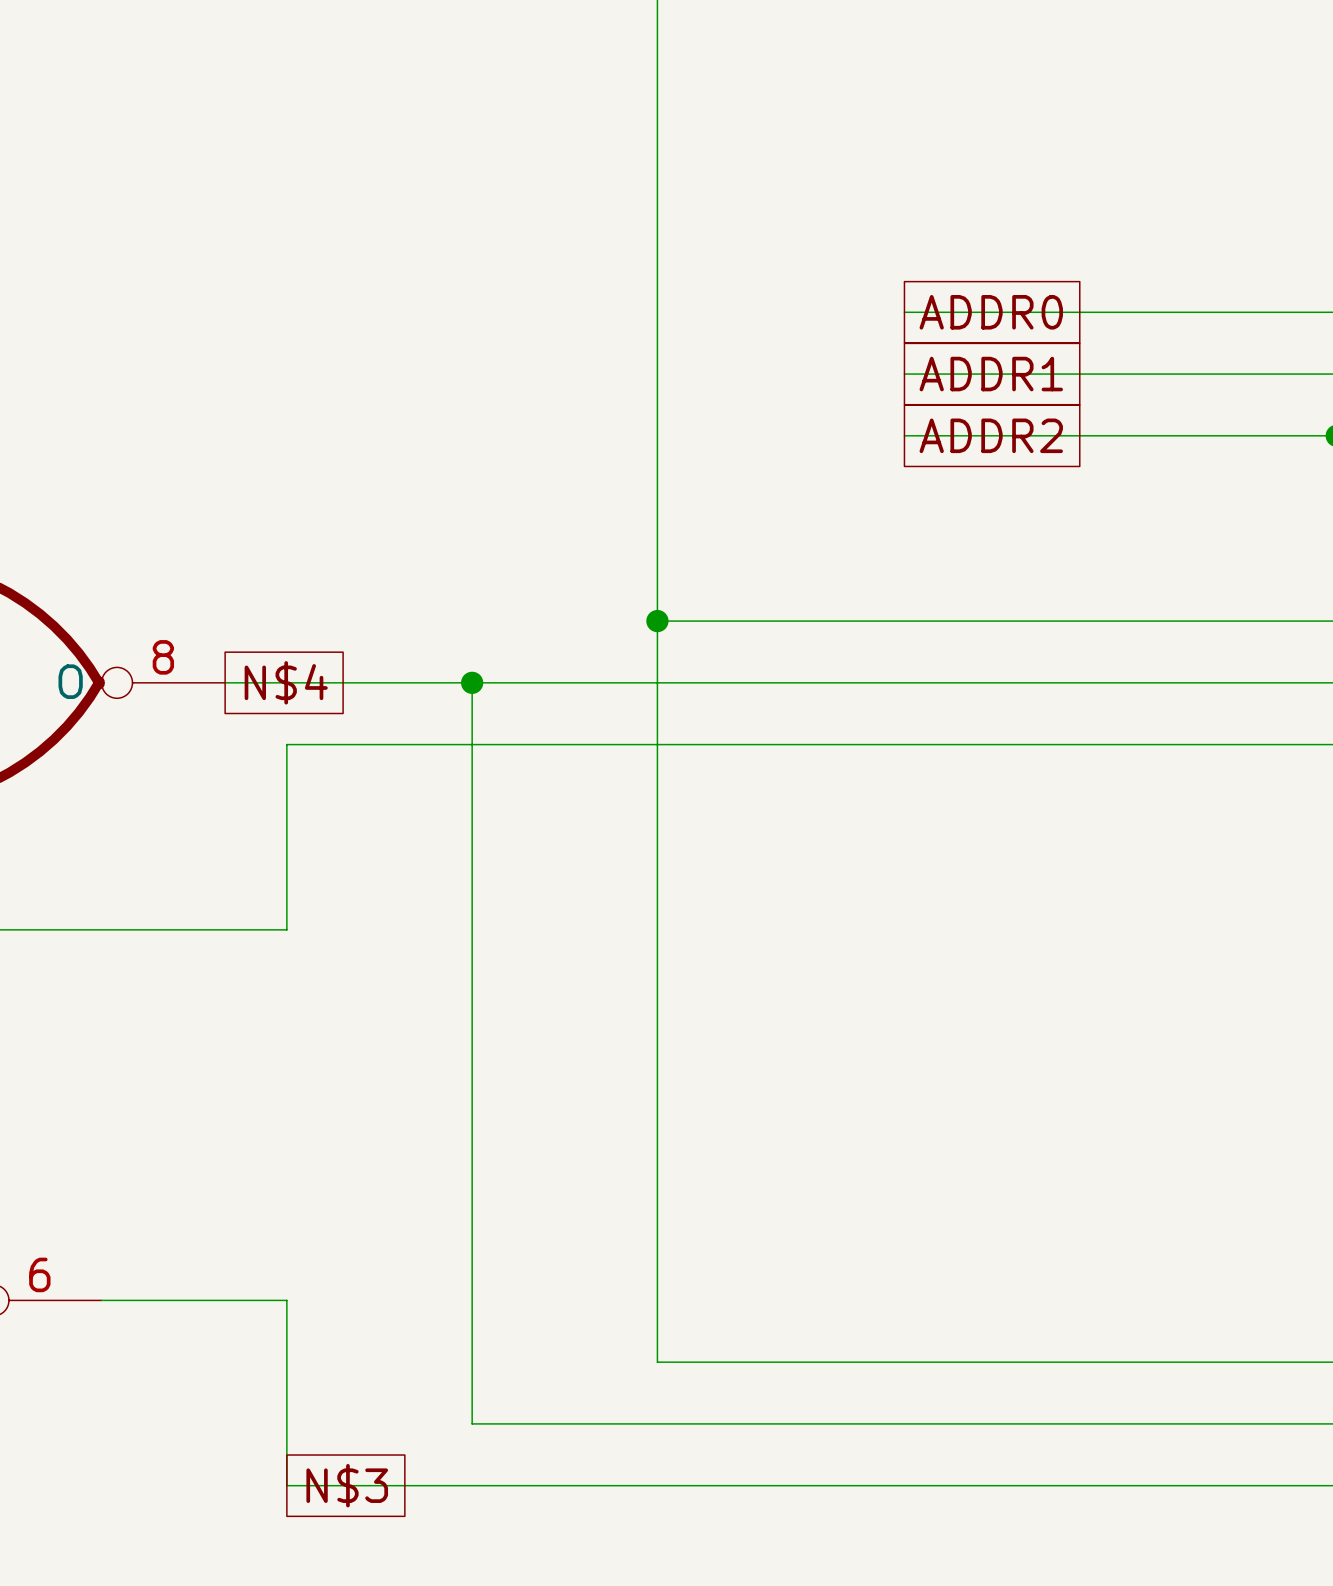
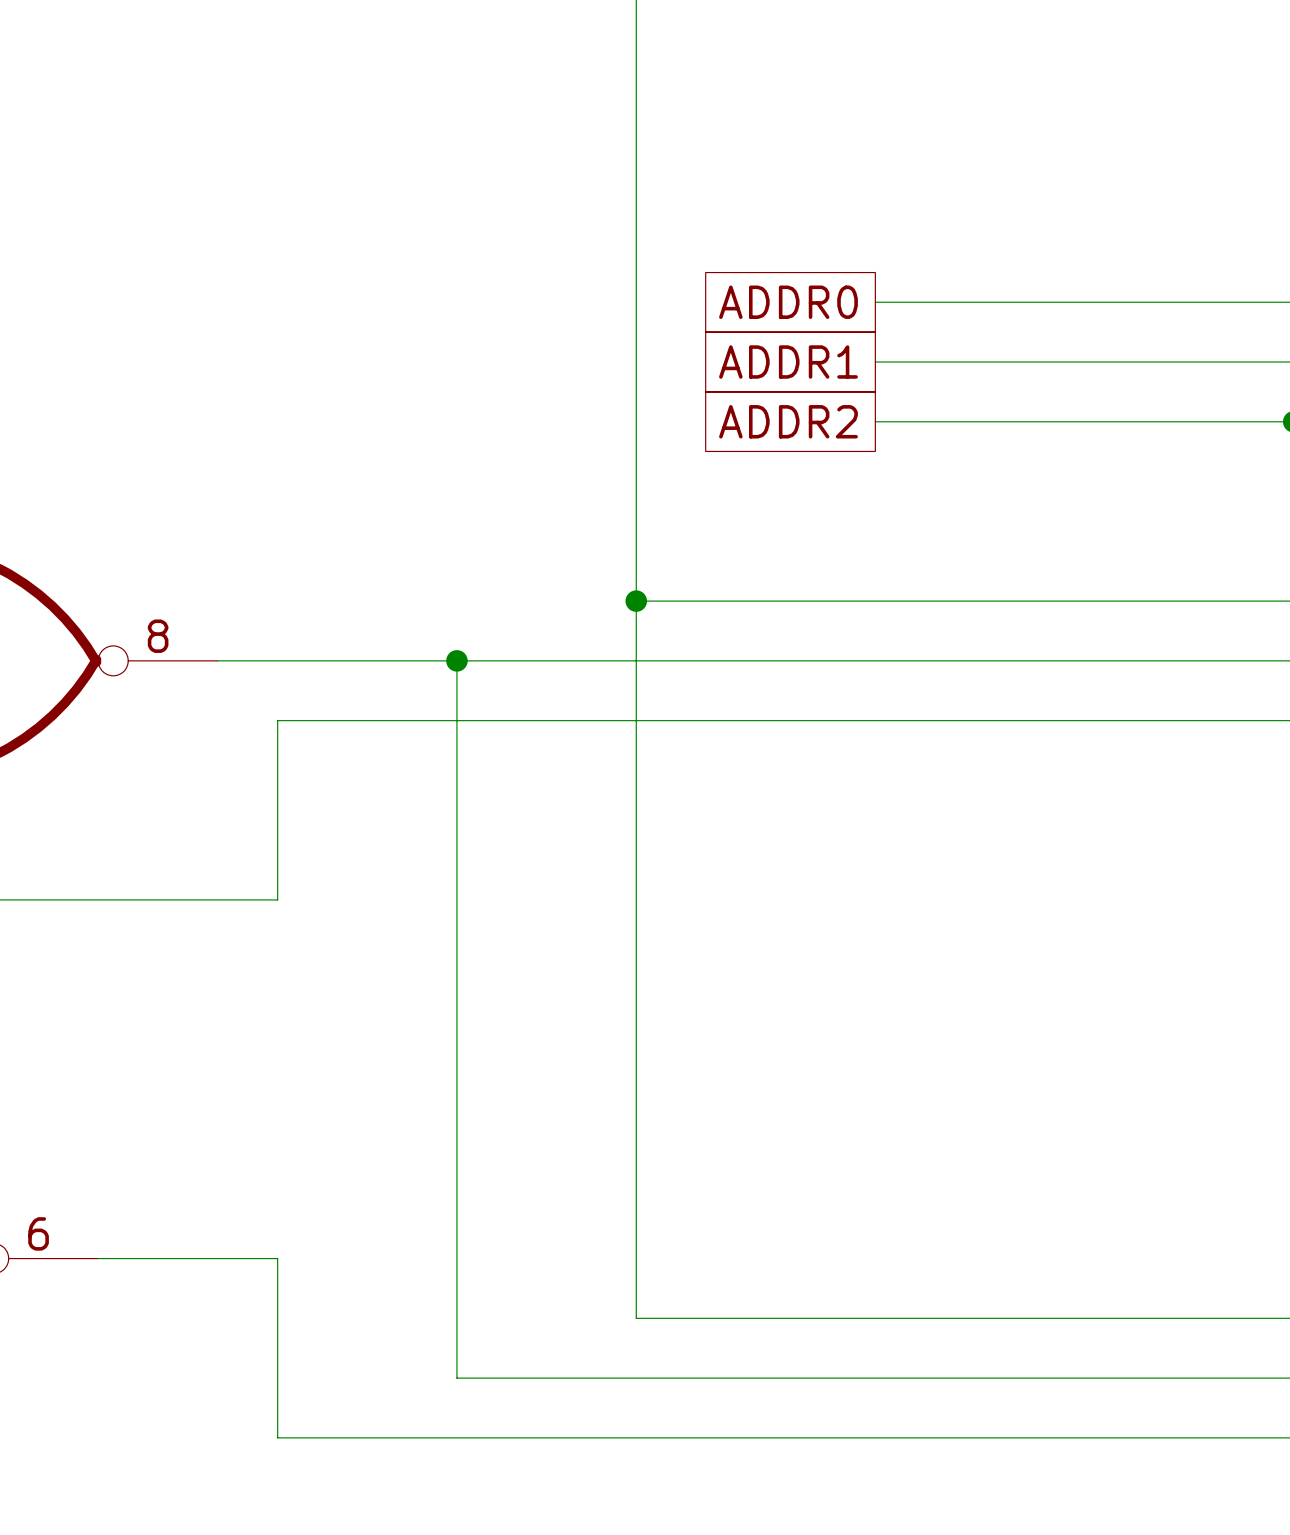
global label rotation: 0° (991, 312) -> 180° (788, 302)
global label rotation: 0° (991, 374) -> 180° (788, 362)
global label rotation: 0° (991, 435) -> 180° (788, 421)
part pin name: O (70, 681) -> none
global label: N$4 (286, 682) -> none
global label: N$3 (347, 1485) -> none

